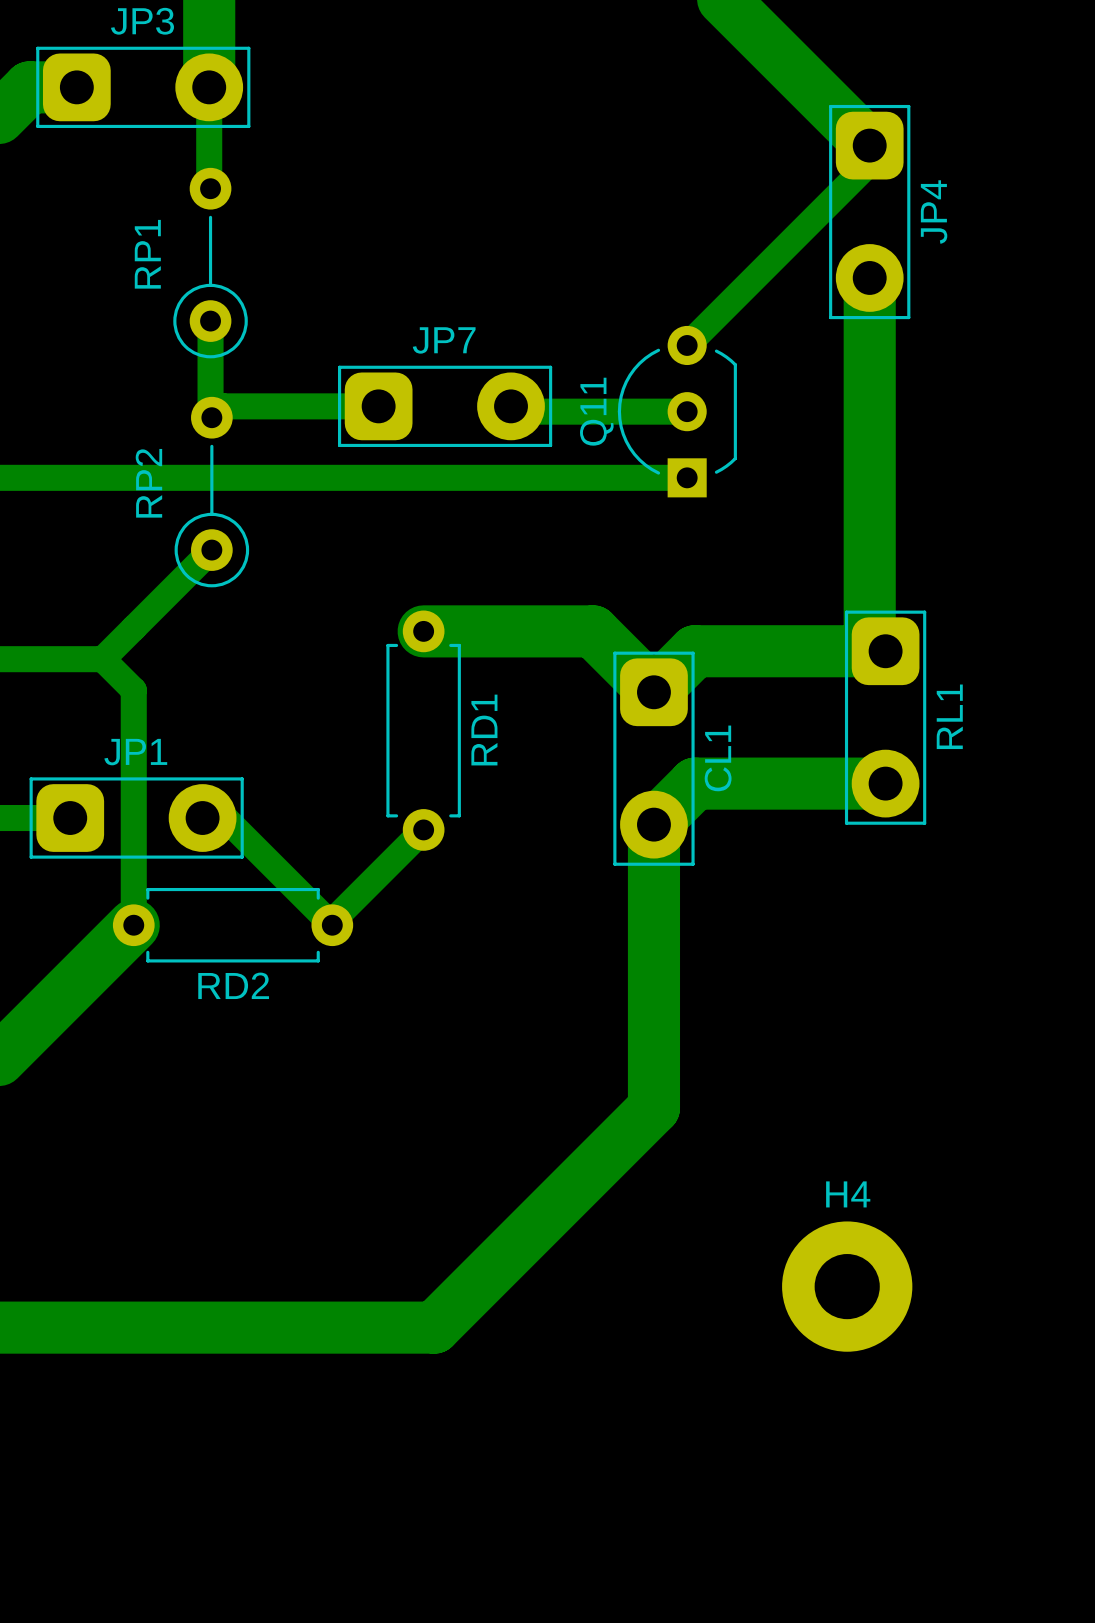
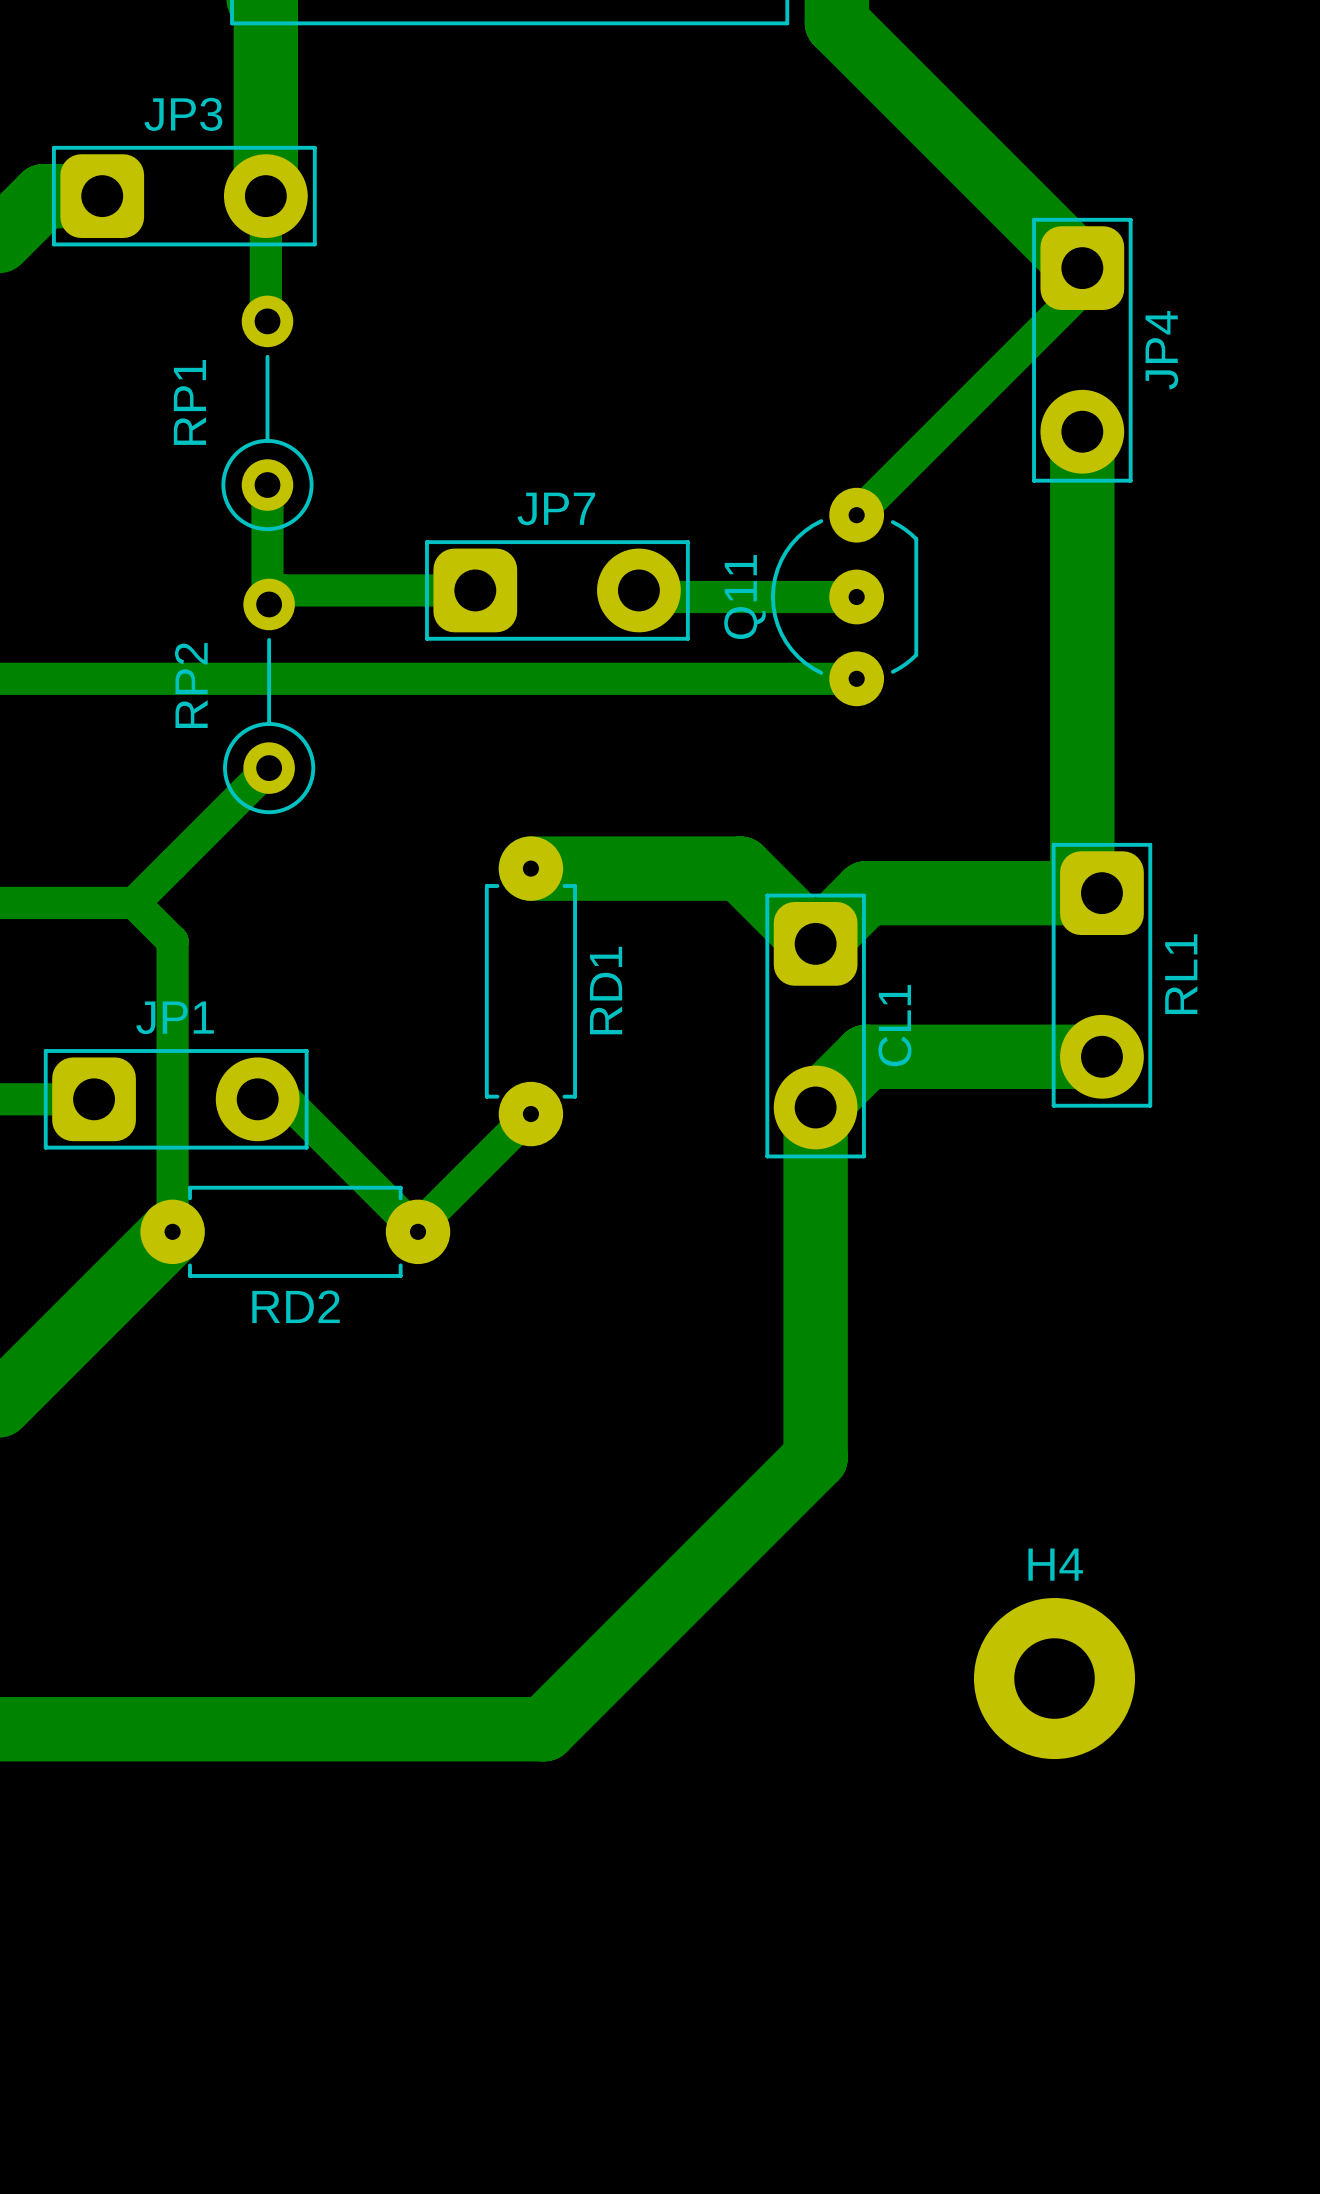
Q11 footprint: [617, 325, 737, 498] -> [771, 487, 919, 707]
RD1 footprint: [386, 610, 461, 851] -> [484, 836, 577, 1147]
RD2 footprint: [112, 887, 354, 963] -> [140, 1185, 451, 1278]

